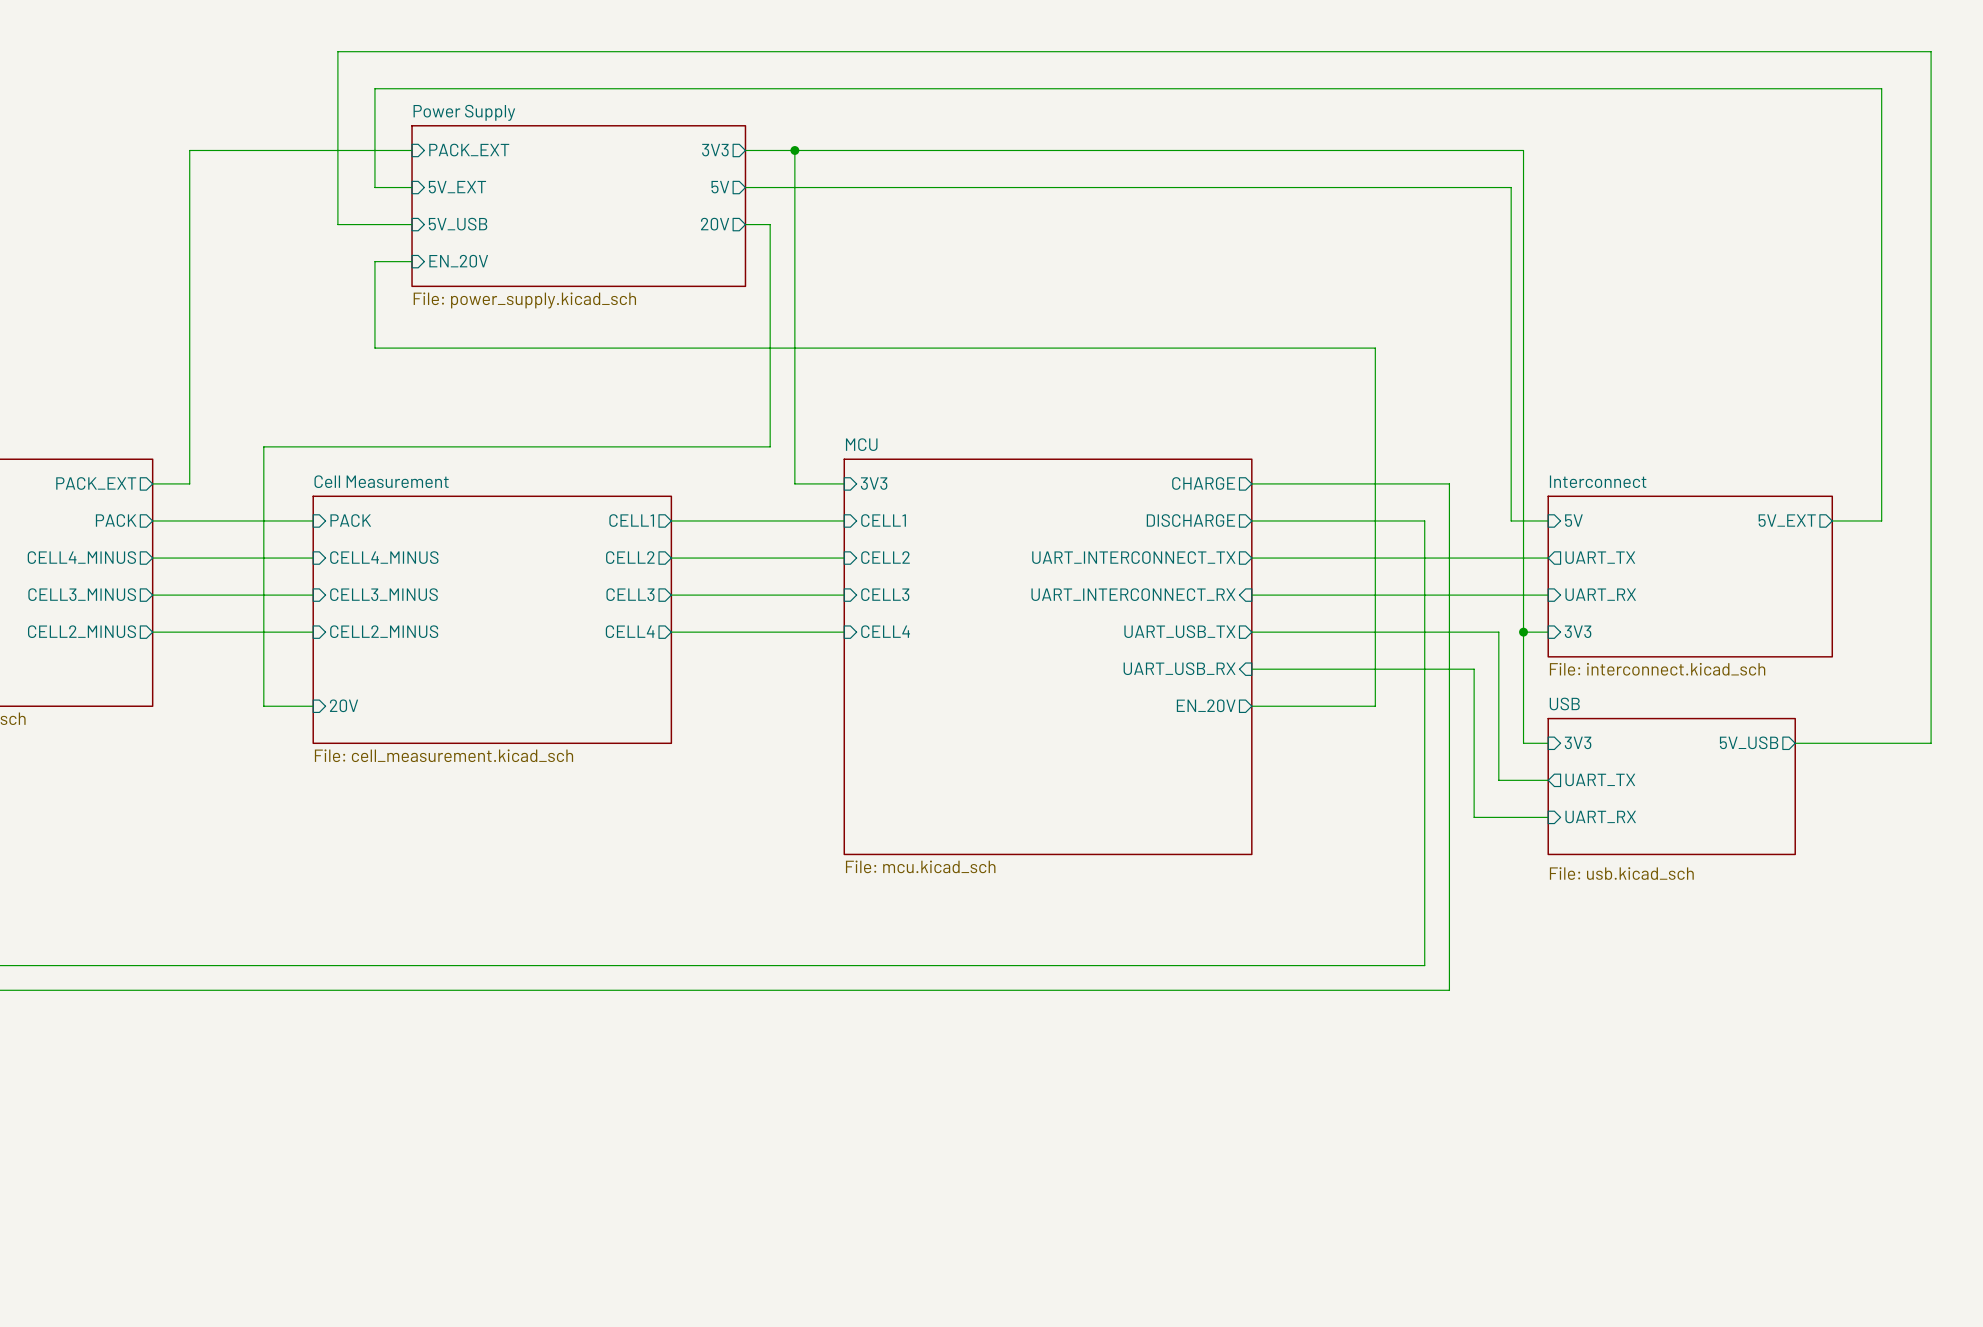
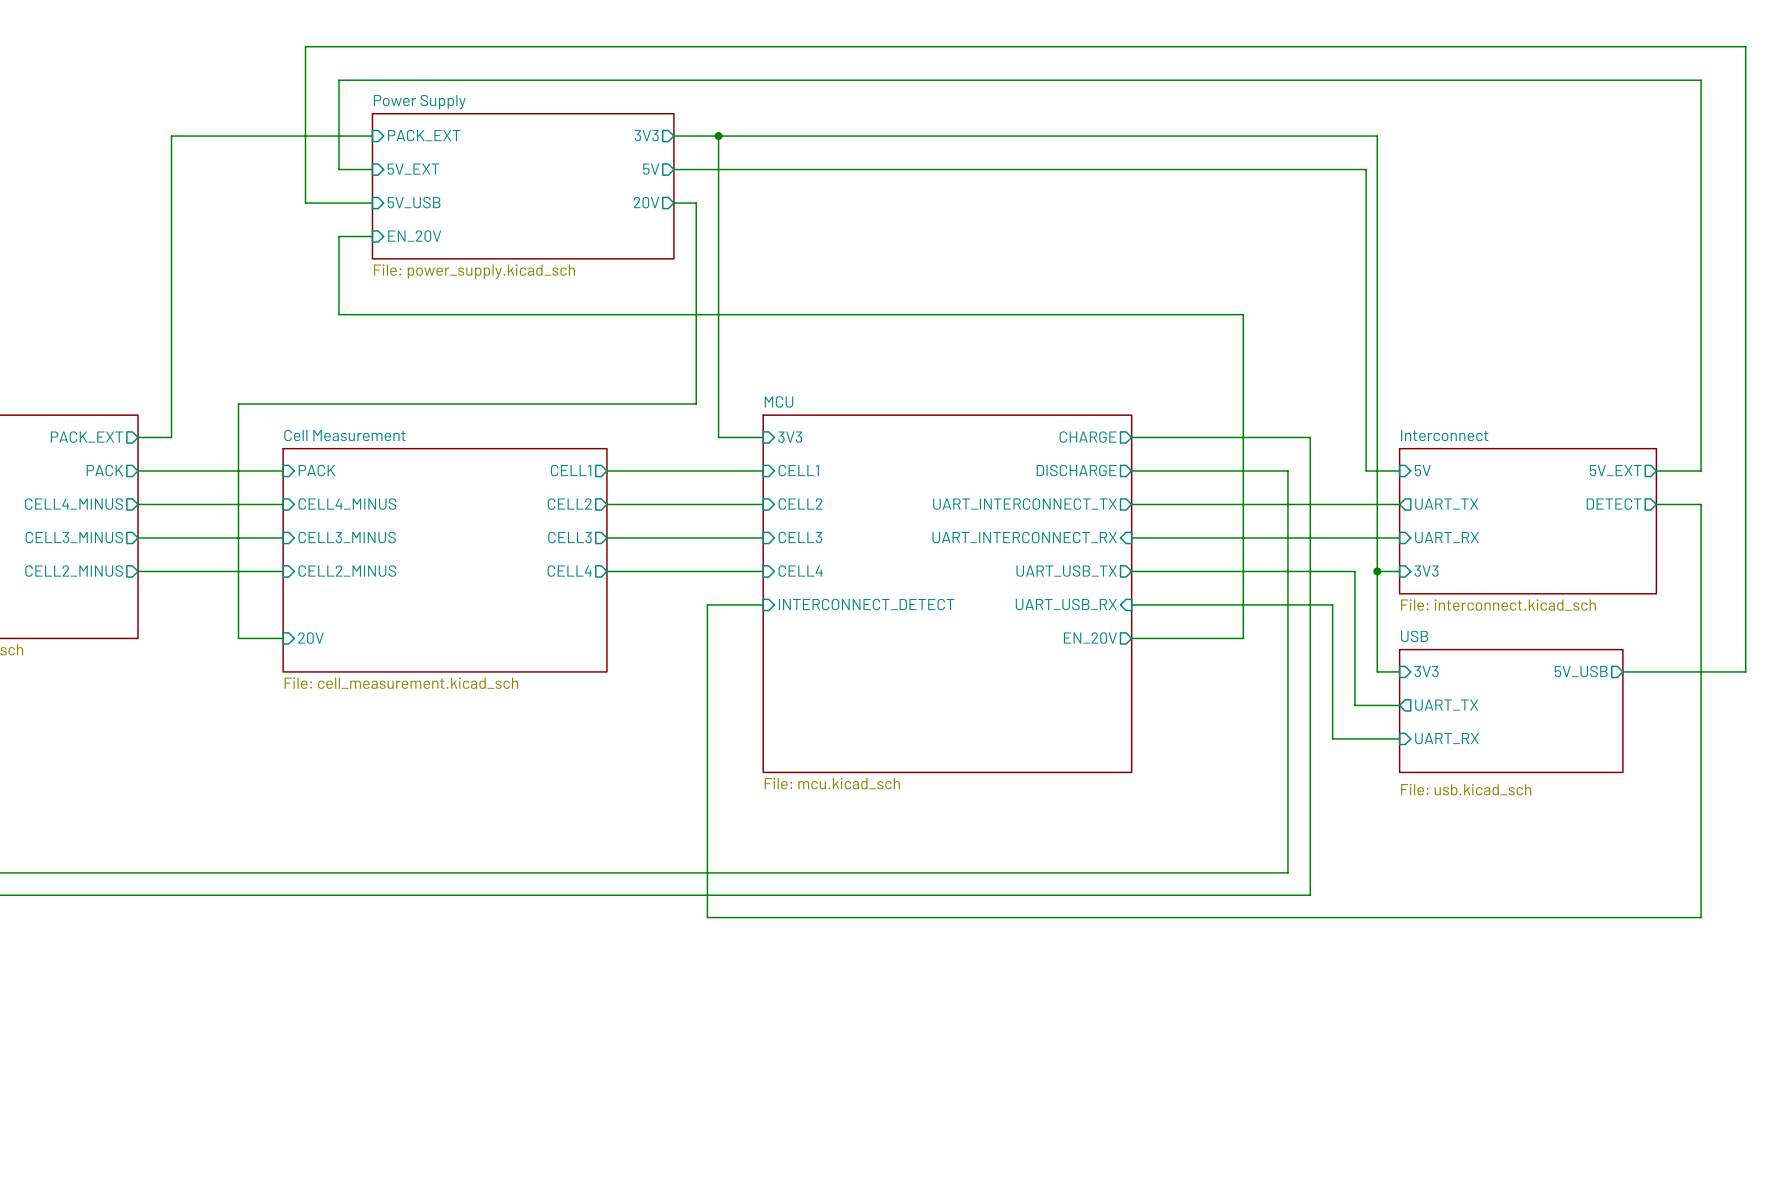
sheet pin: none -> DETECT (1614, 504)
wire: none -> (1656, 504) (1701, 504) (1701, 917) (707, 917) (707, 604) (763, 604)
sheet pin: none -> INTERCONNECT_DETECT (866, 604)

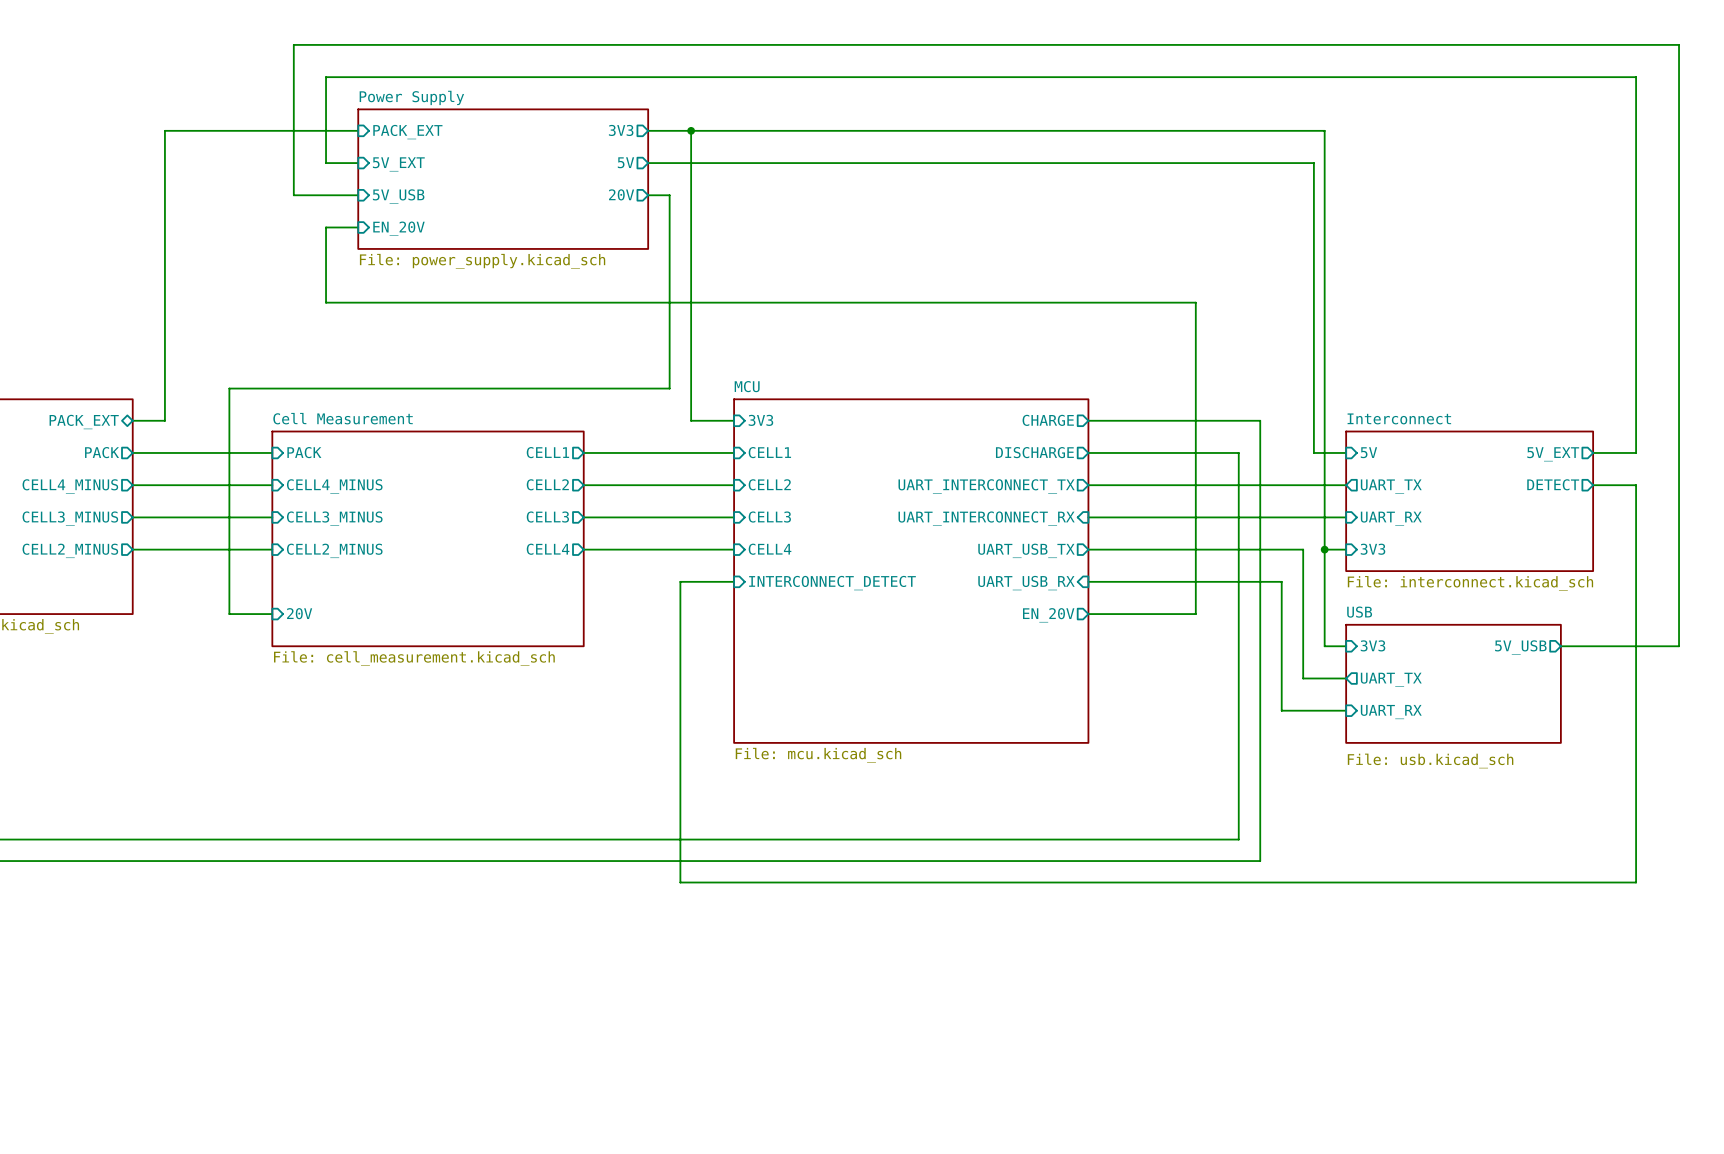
sheet pin shape: output (86, 437) -> bidirectional (84, 422)

